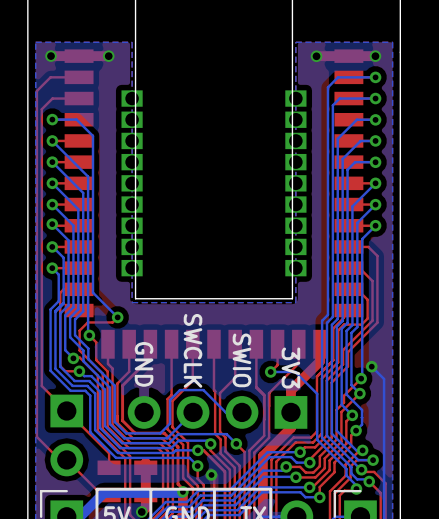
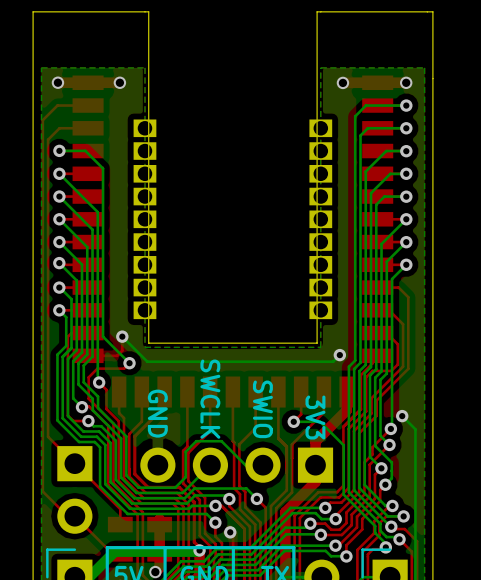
top track: none -> (122, 336) (122, 350) (117, 355) (93, 355)
bottom track: none -> (122, 336) (147, 361) (333, 361) (339, 355)
via: none -> (122, 336)
via: none -> (339, 355)

